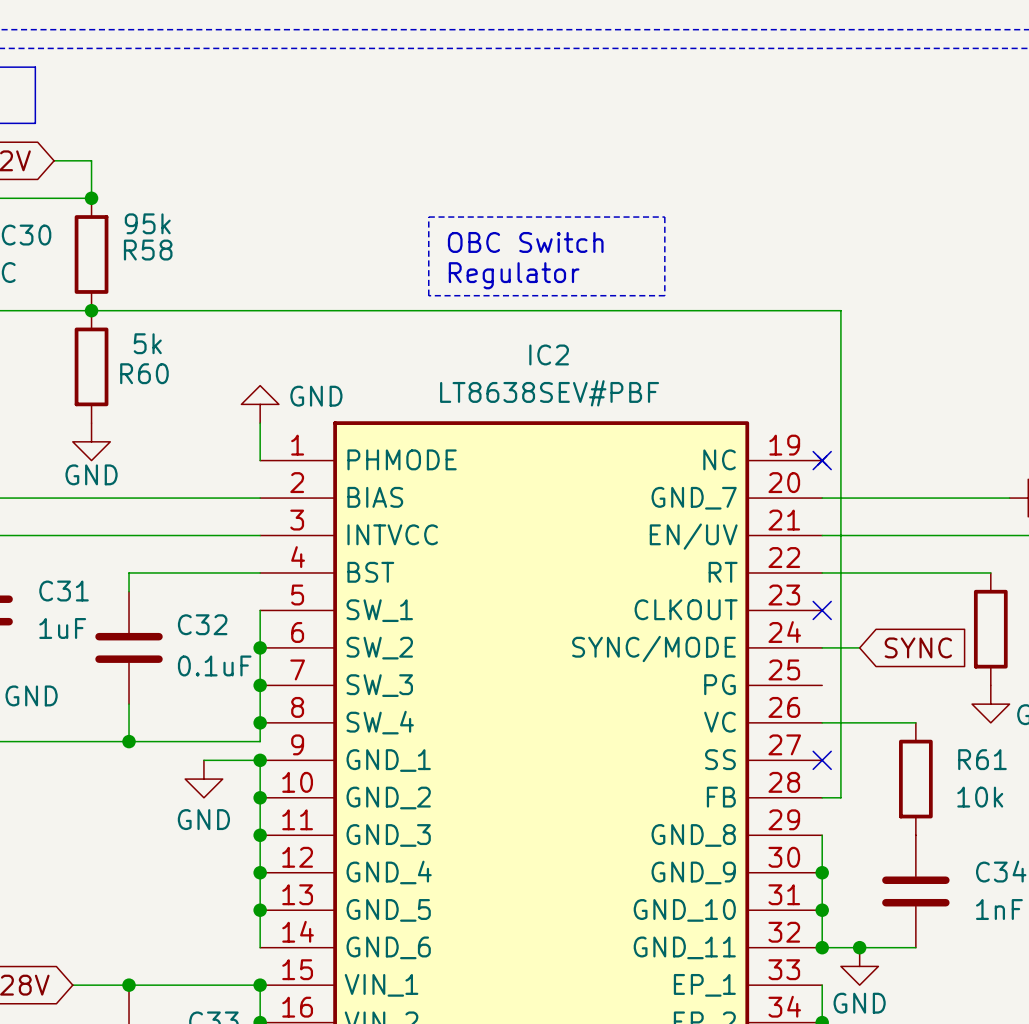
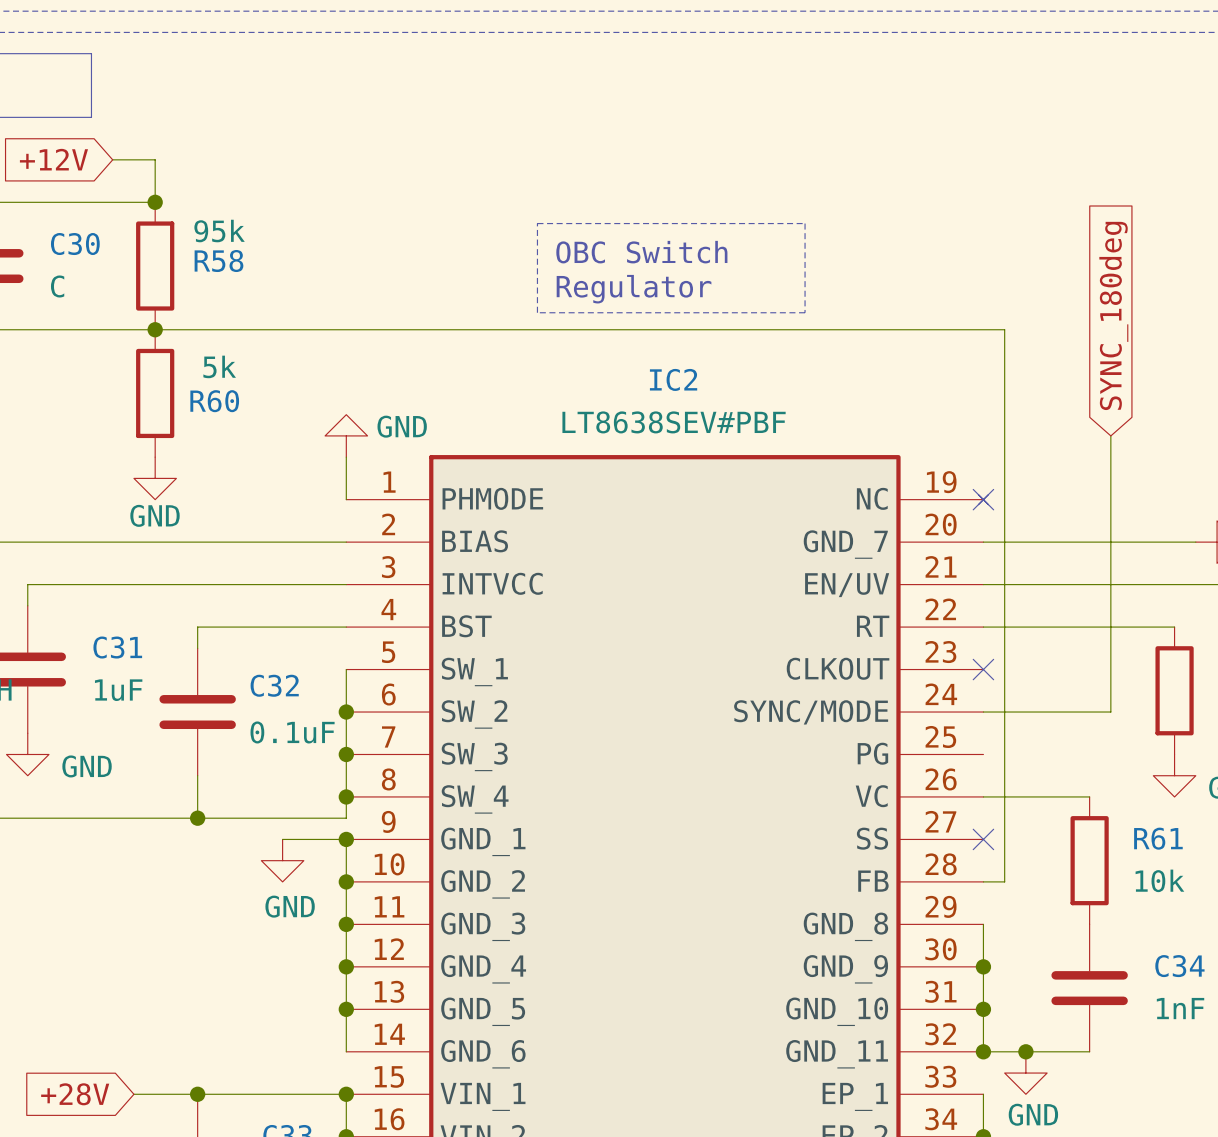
global label: none -> SYNC_180deg (1113, 315)
wire: none -> (1110, 435) (1110, 712) (1025, 712)
global label: SYNC (918, 647) -> none

